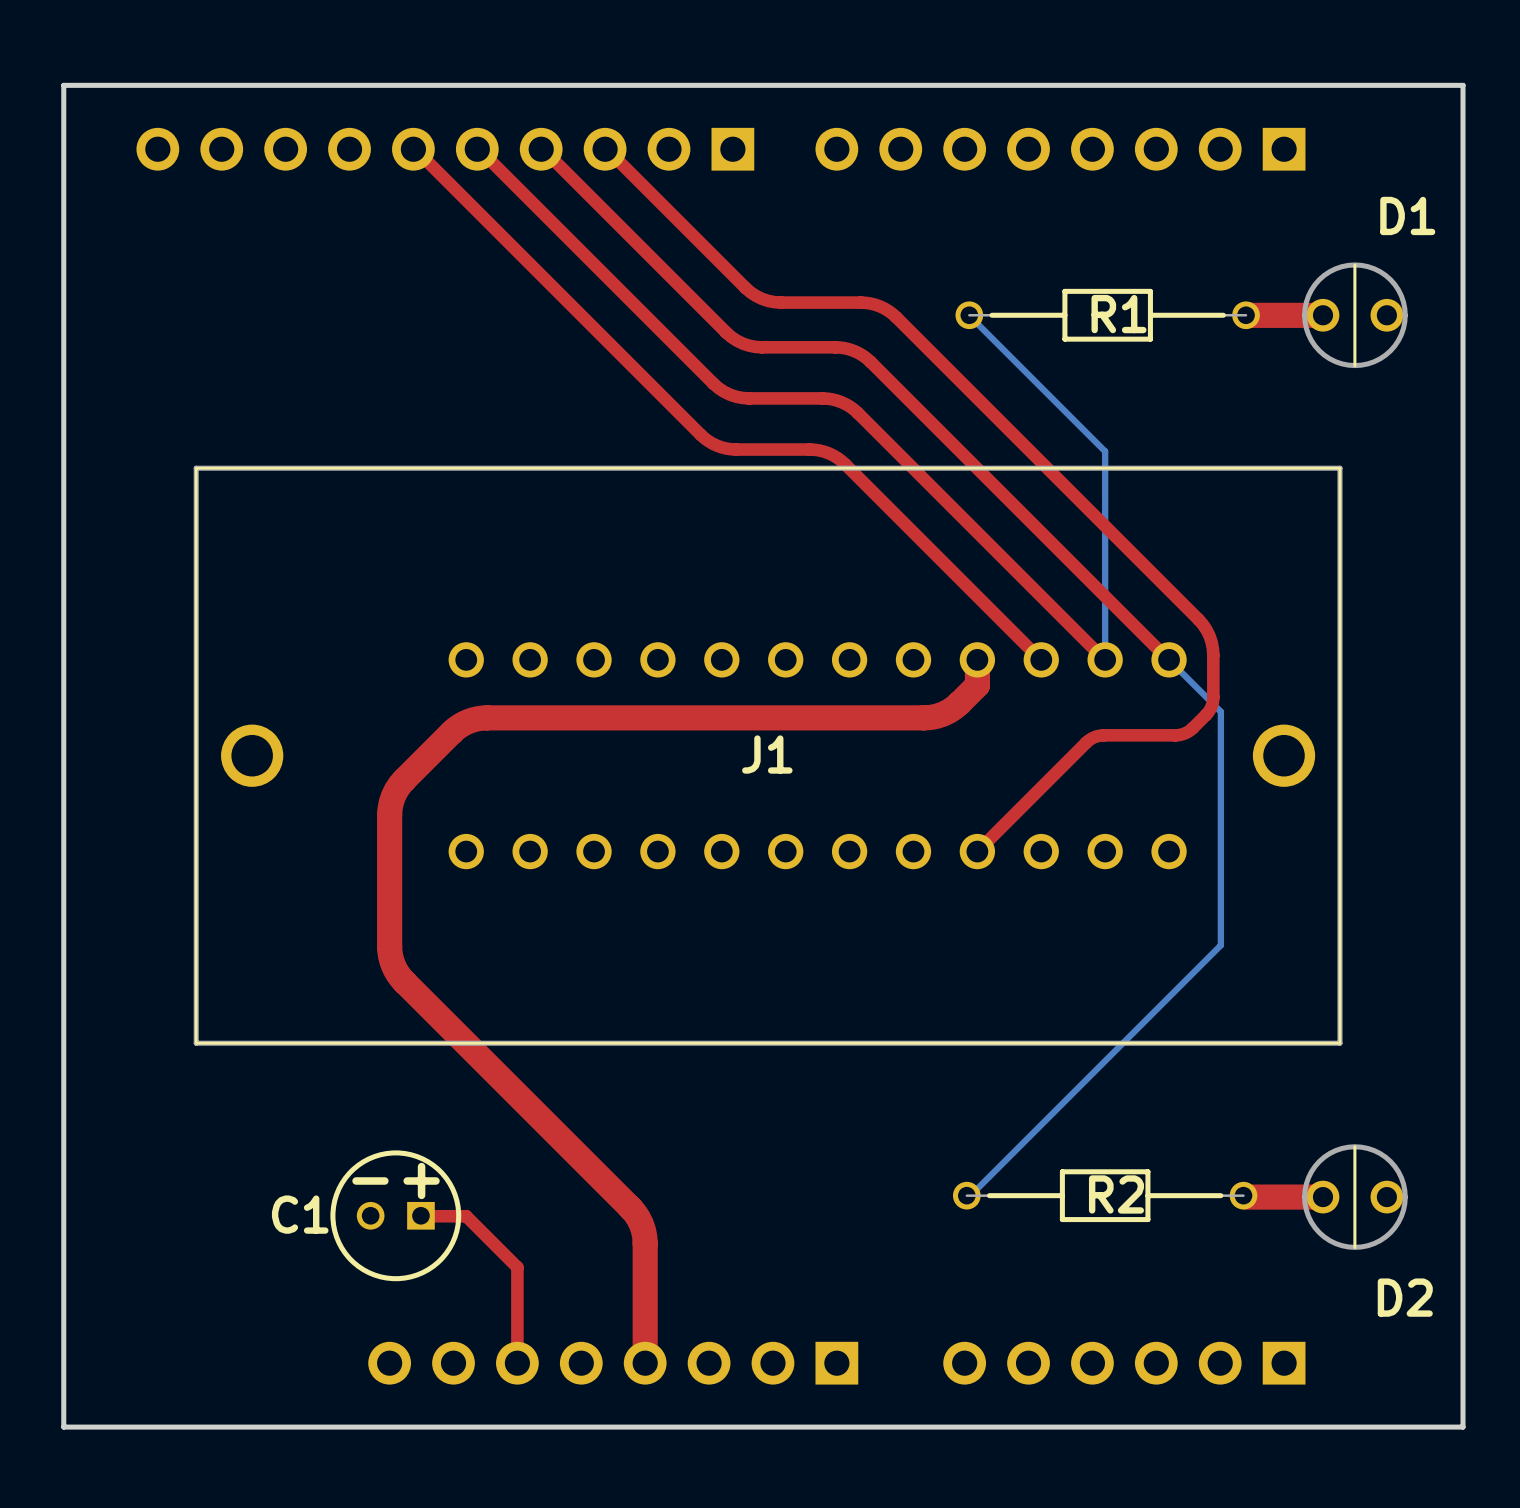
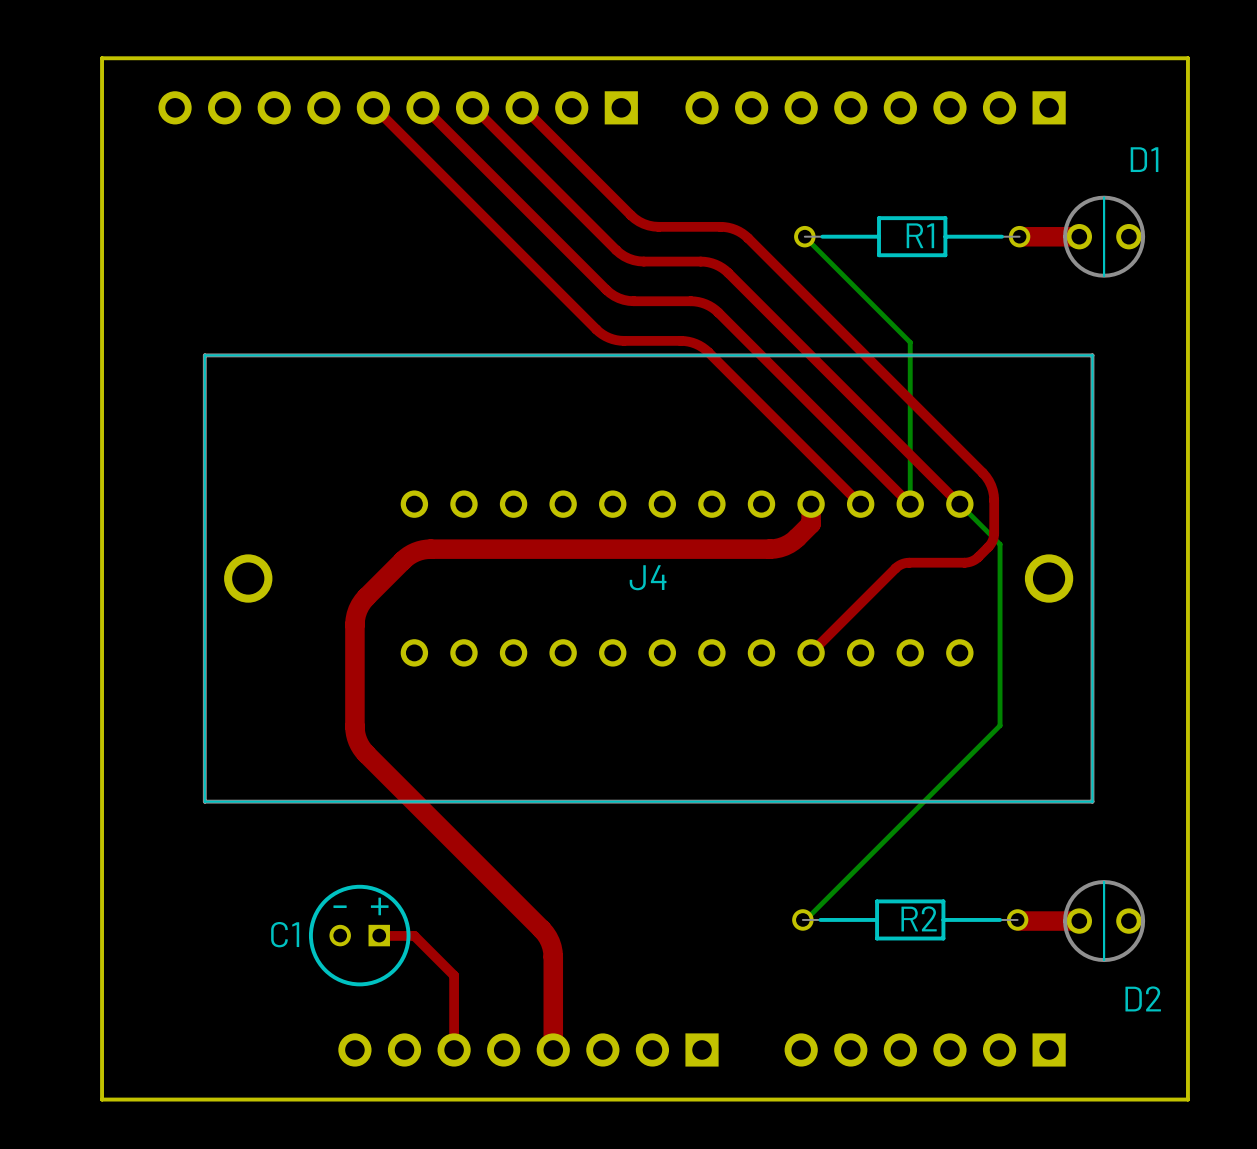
J1 name: J1 (767, 754) -> J4 (648, 577)

